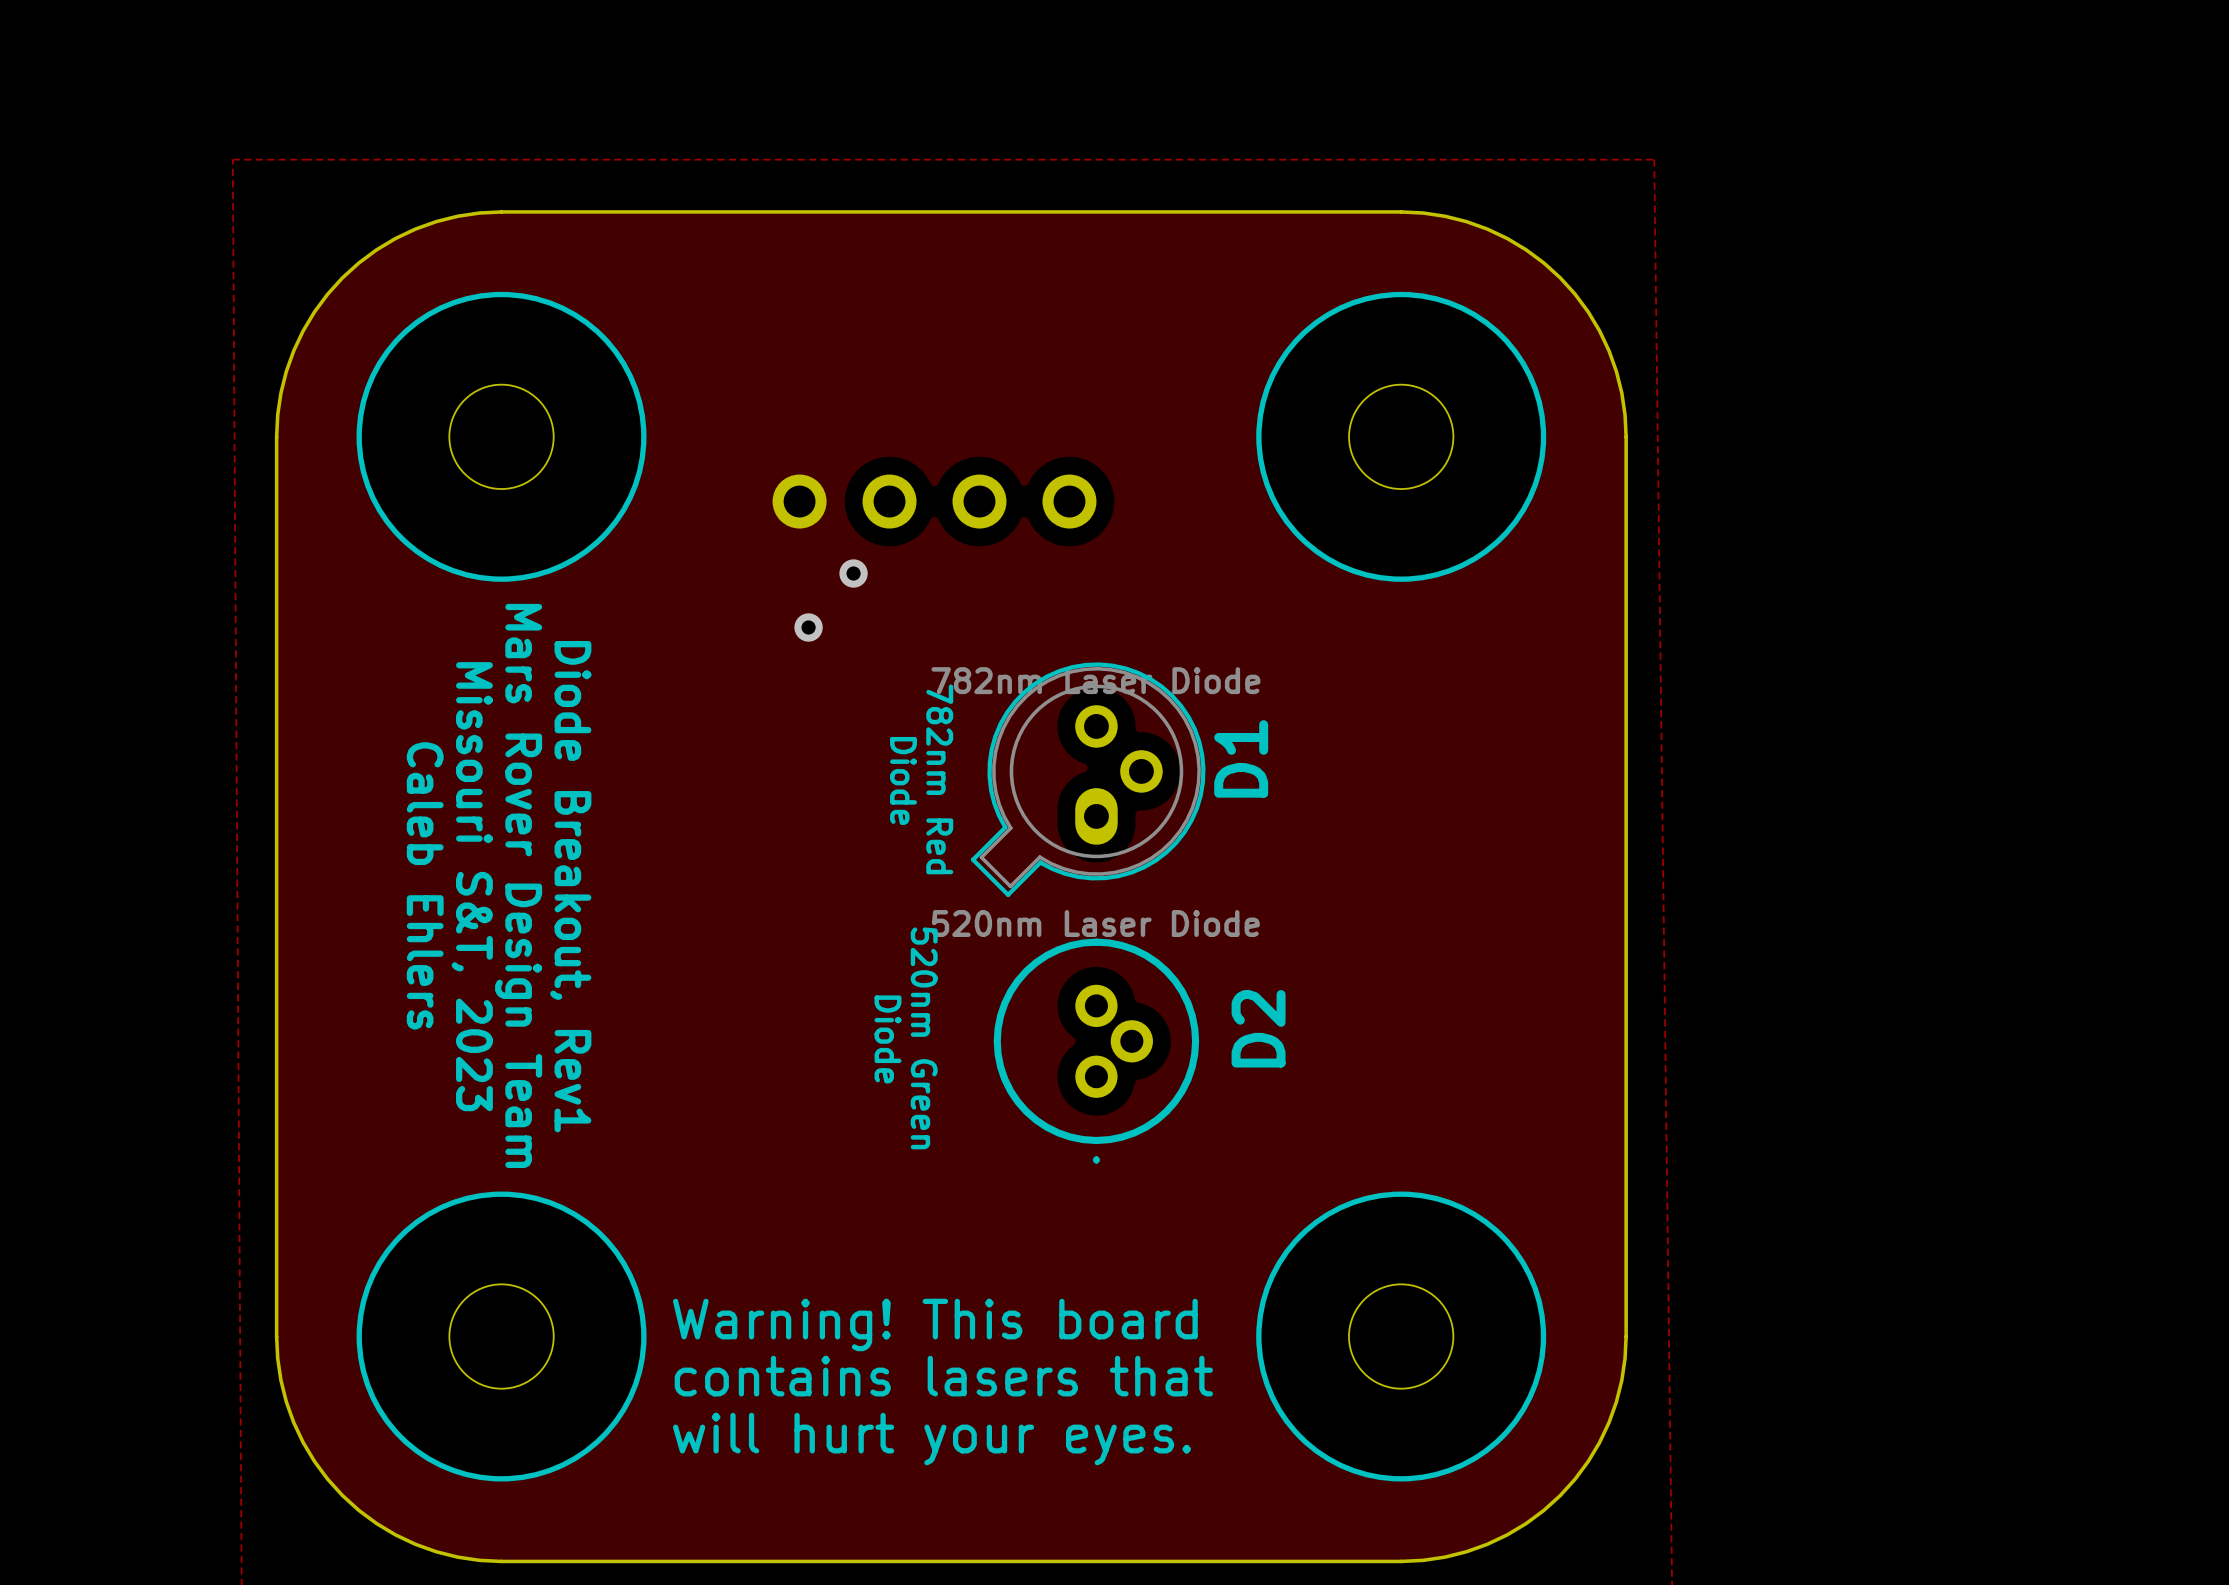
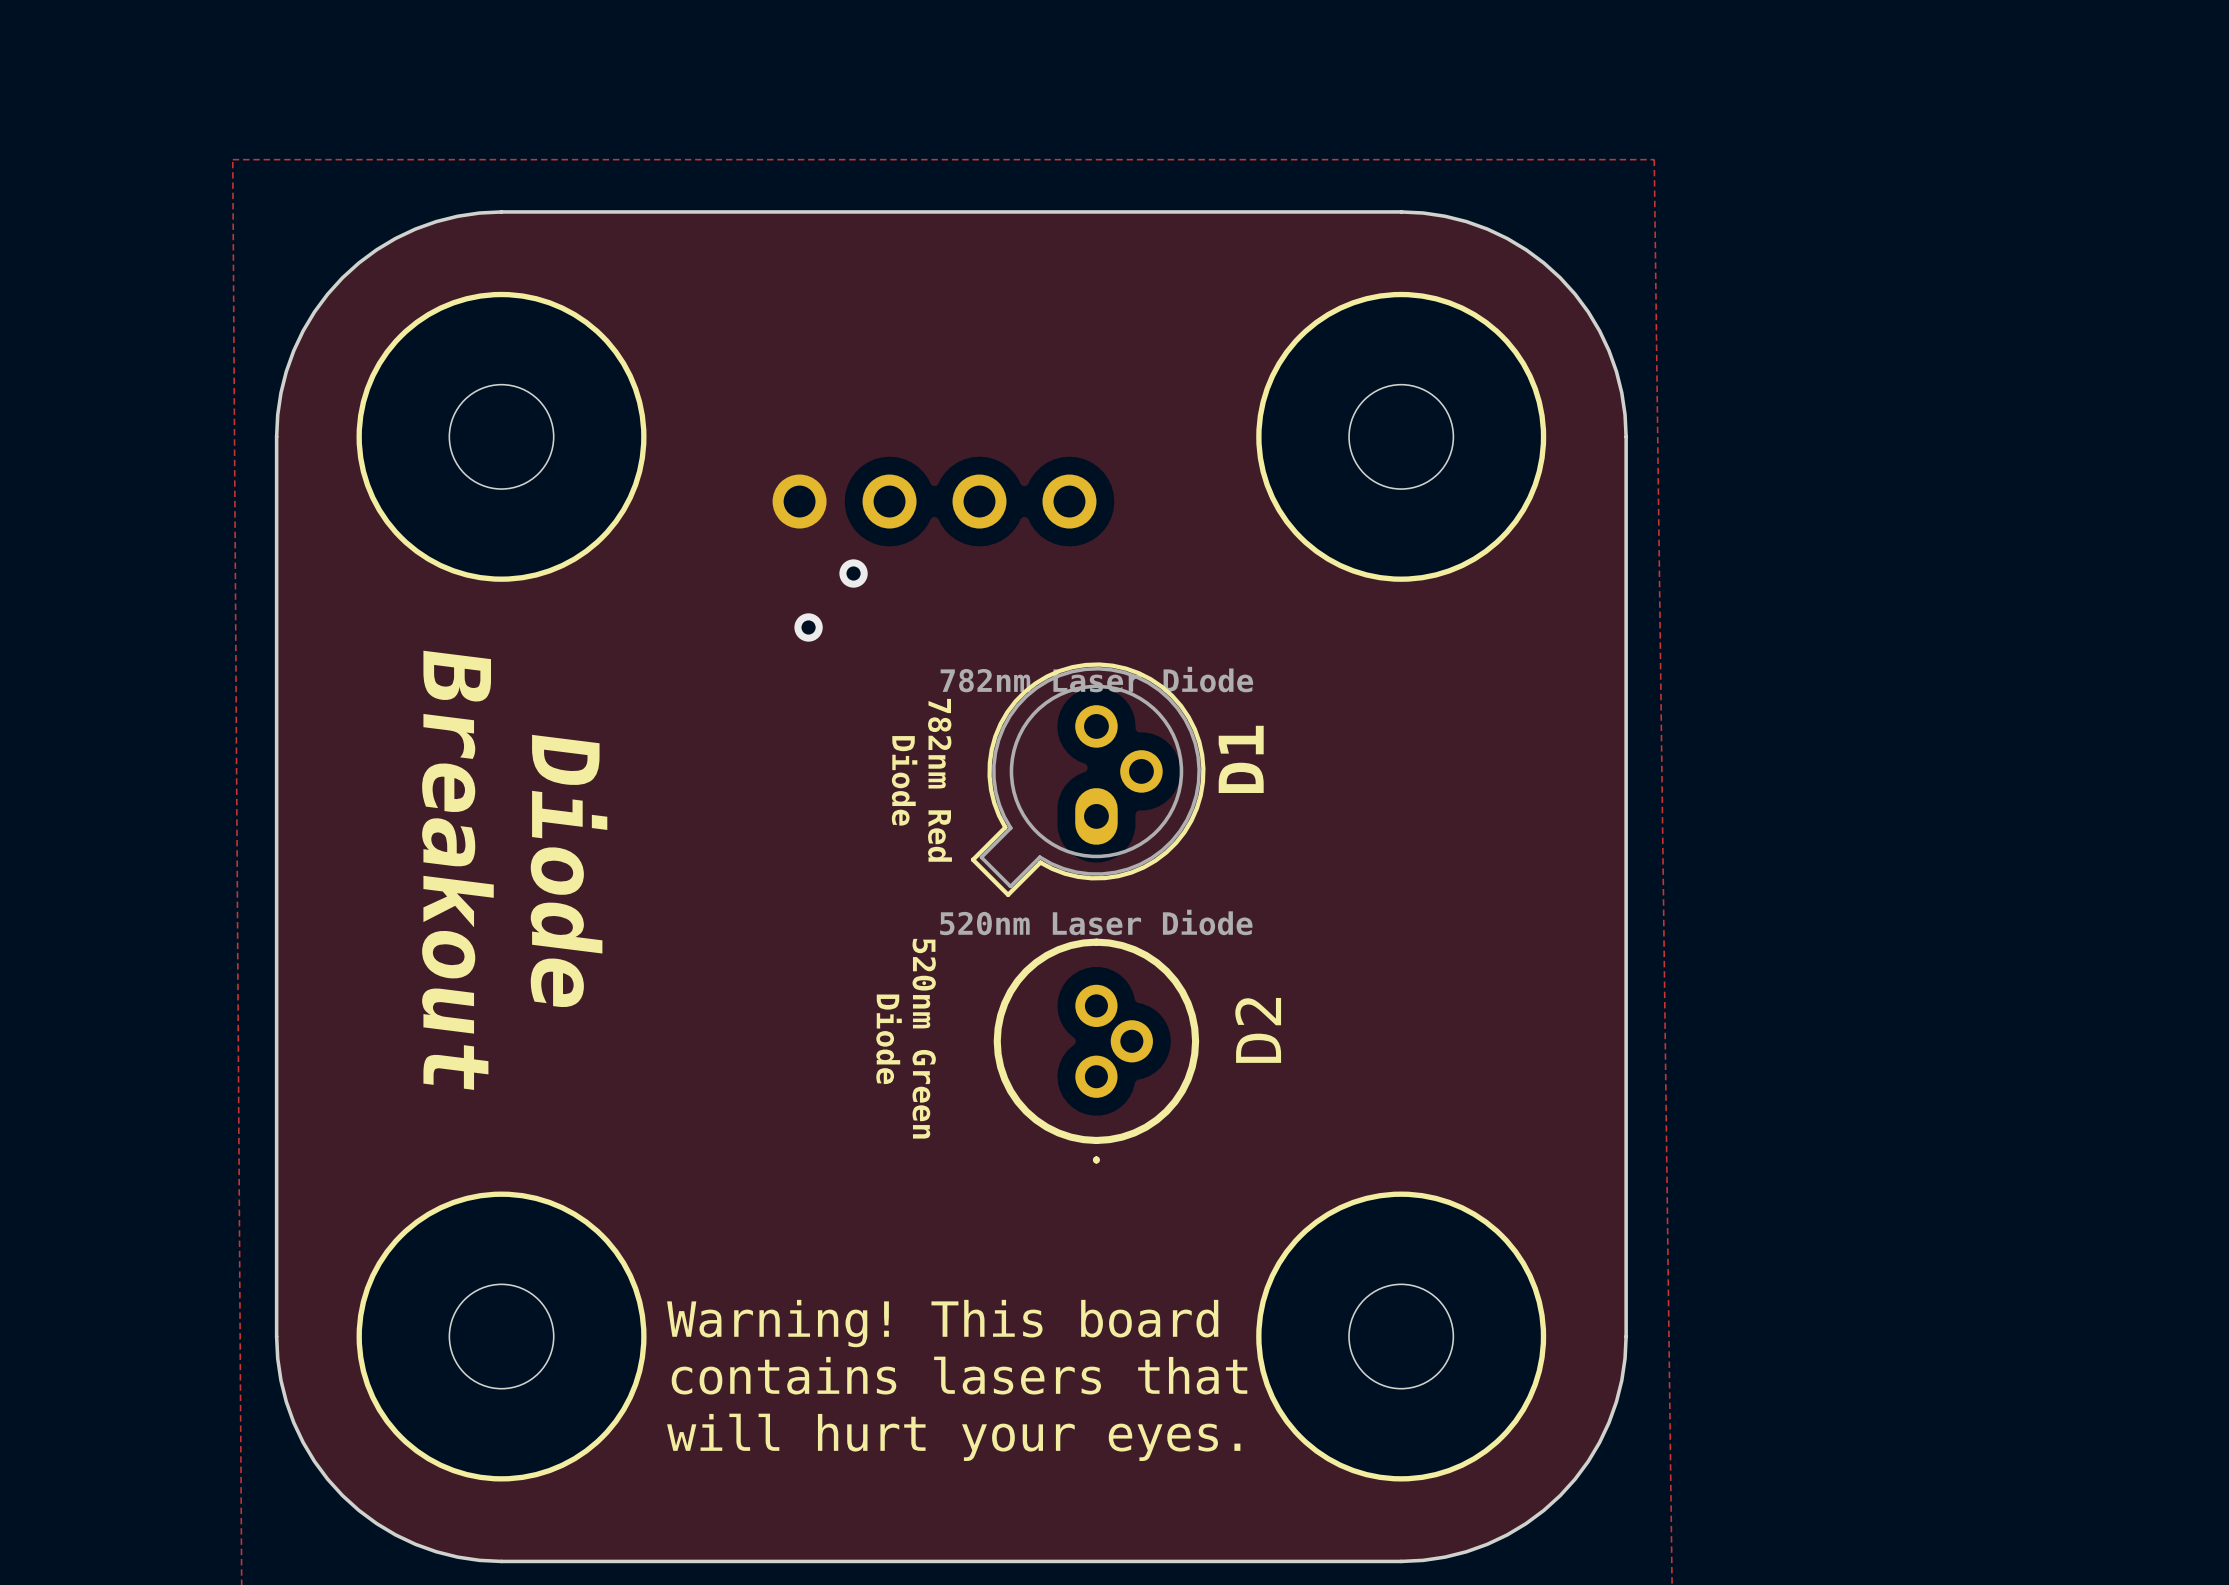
text: none -> Diode (569, 871)
text: Caleb Ehlers (425, 885) -> Breakout (457, 870)
text: Mars Rover Design Team (518, 885) -> none
text: Missouri S&T, 2023 (472, 886) -> none
text: Diode Breakout, Rev1 (570, 886) -> none

